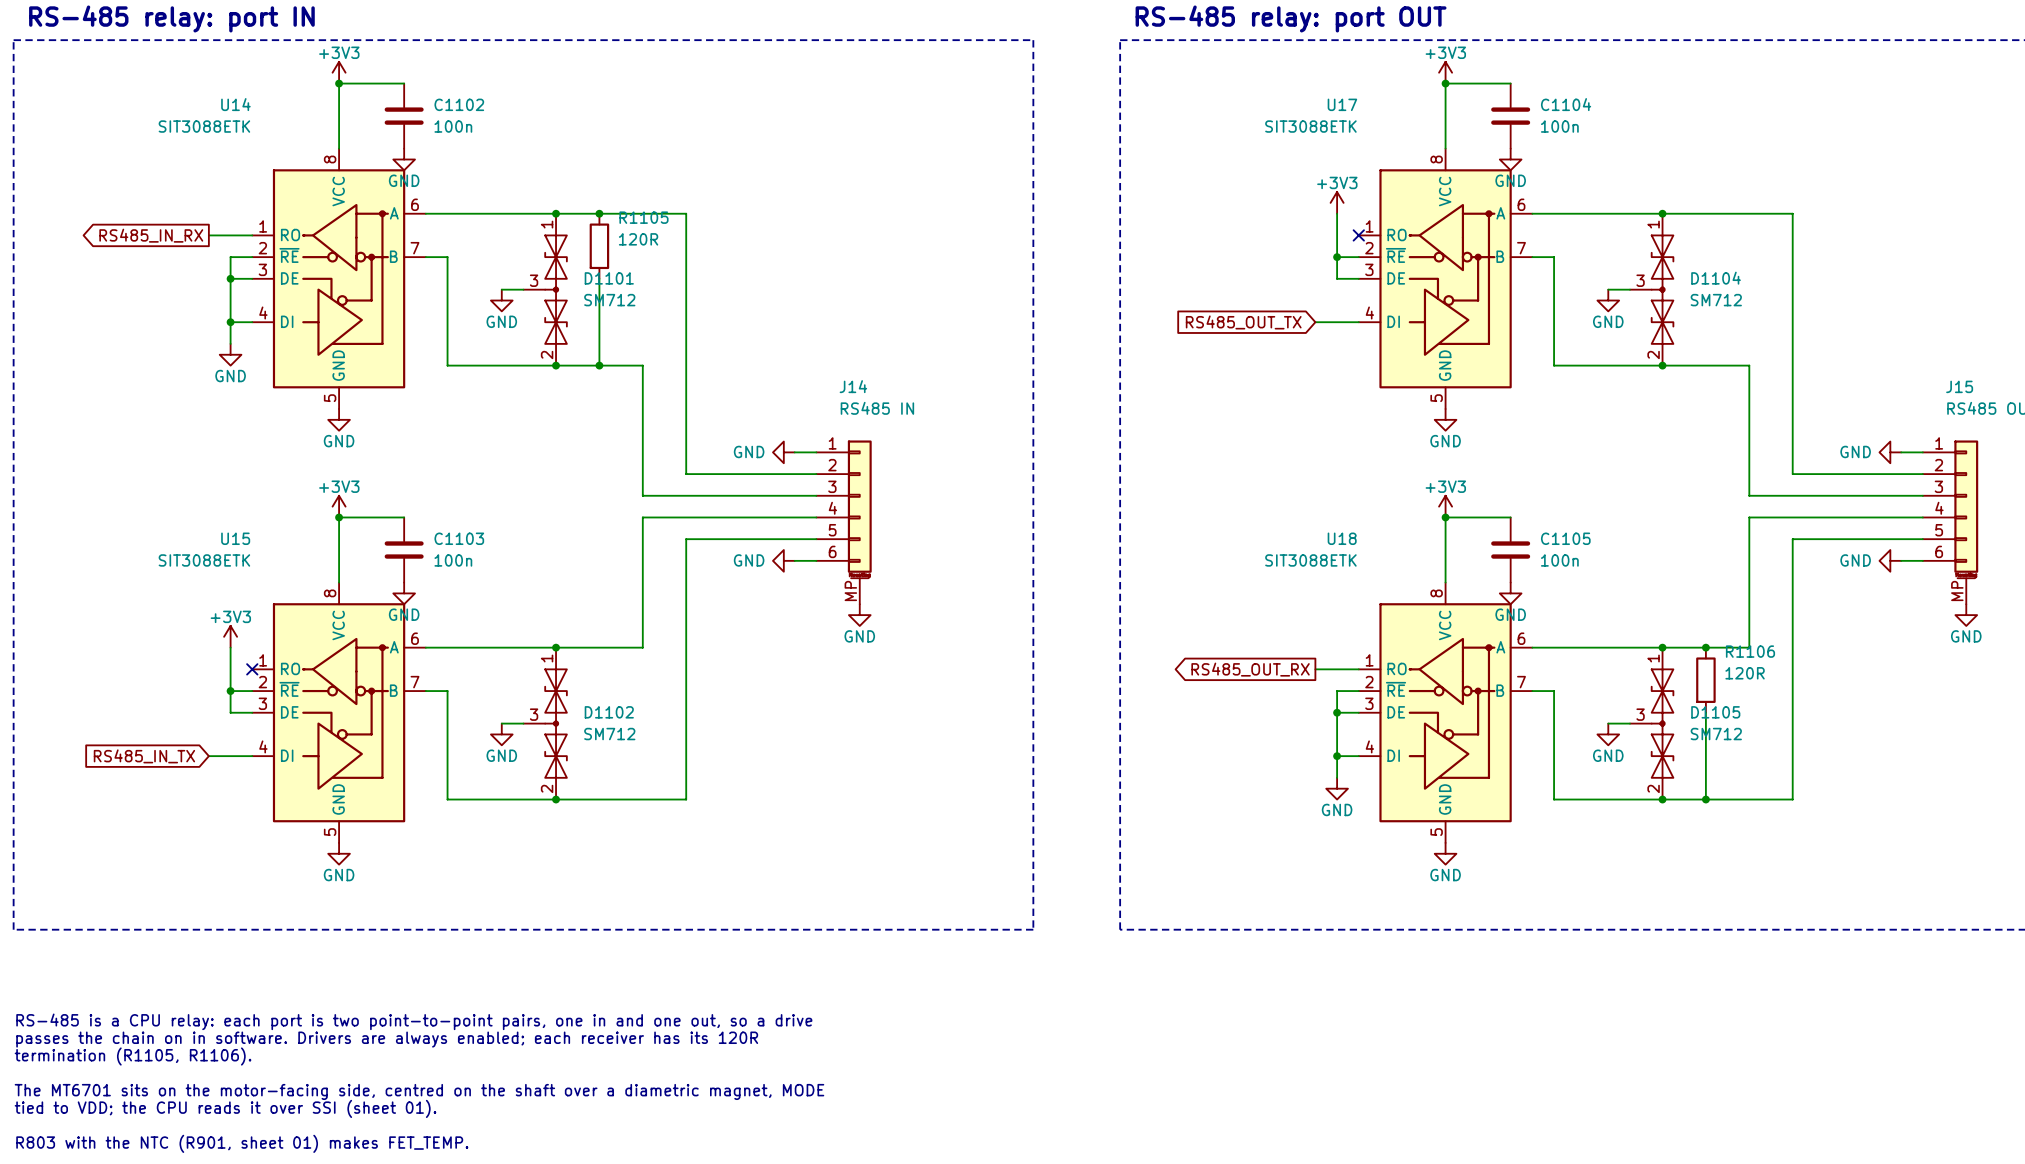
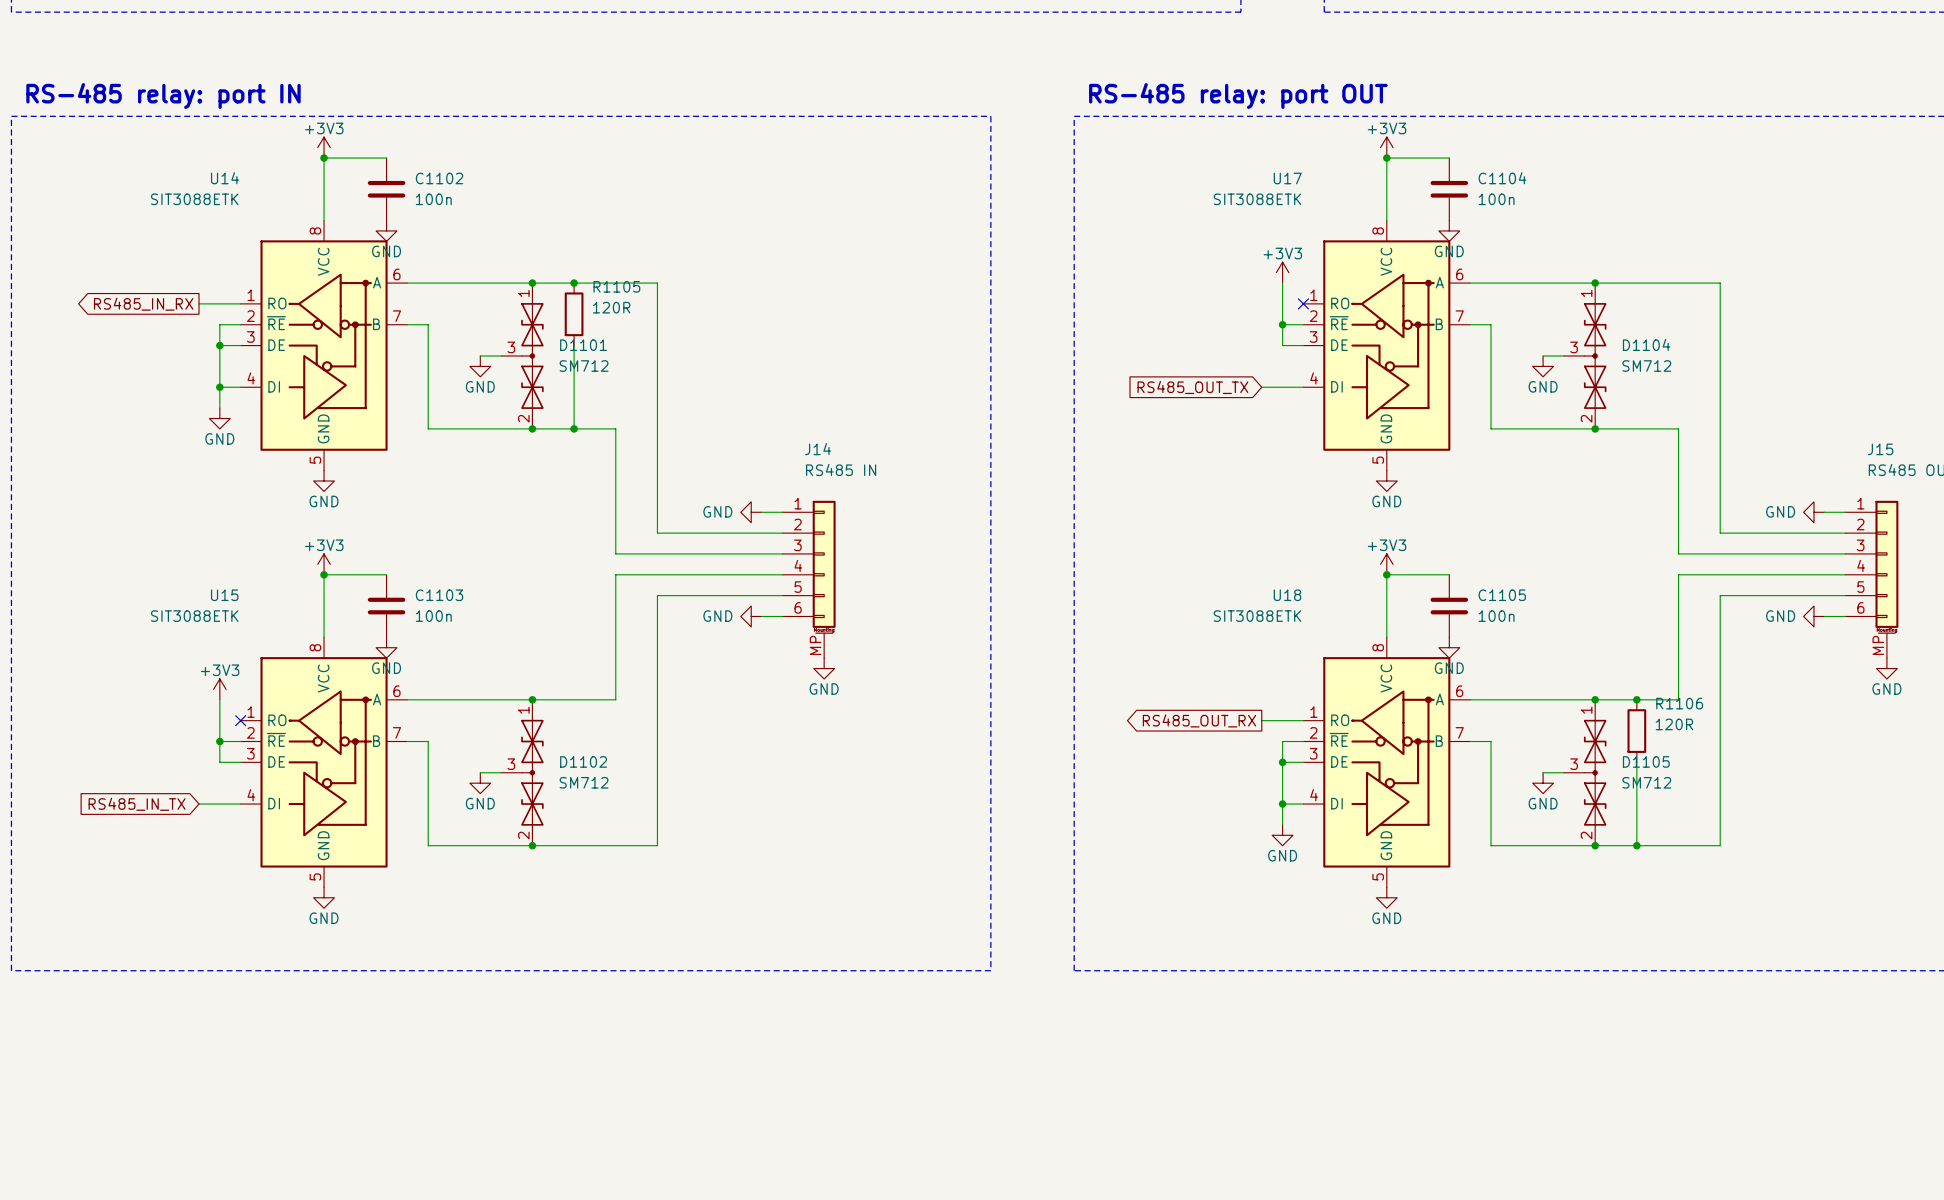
text: RS-485 is a CPU relay: each port is two point-to-point pairs, one in and one out, so a drive (414, 1021) -> none
text: passes the chain on in software. Drivers are always enabled; each receiver has its 120R (387, 1039) -> none
text: termination (R1105, R1106). (133, 1056) -> none
text: The MT6701 sits on the motor-facing side, centred on the shaft over a diametric magnet, MODE (419, 1091) -> none
text: tied to VDD; the CPU reads it over SSI (sheet 01). (225, 1108) -> none
text: R803 with the NTC (R901, sheet 01) makes FET_TEMP. (242, 1143) -> none

